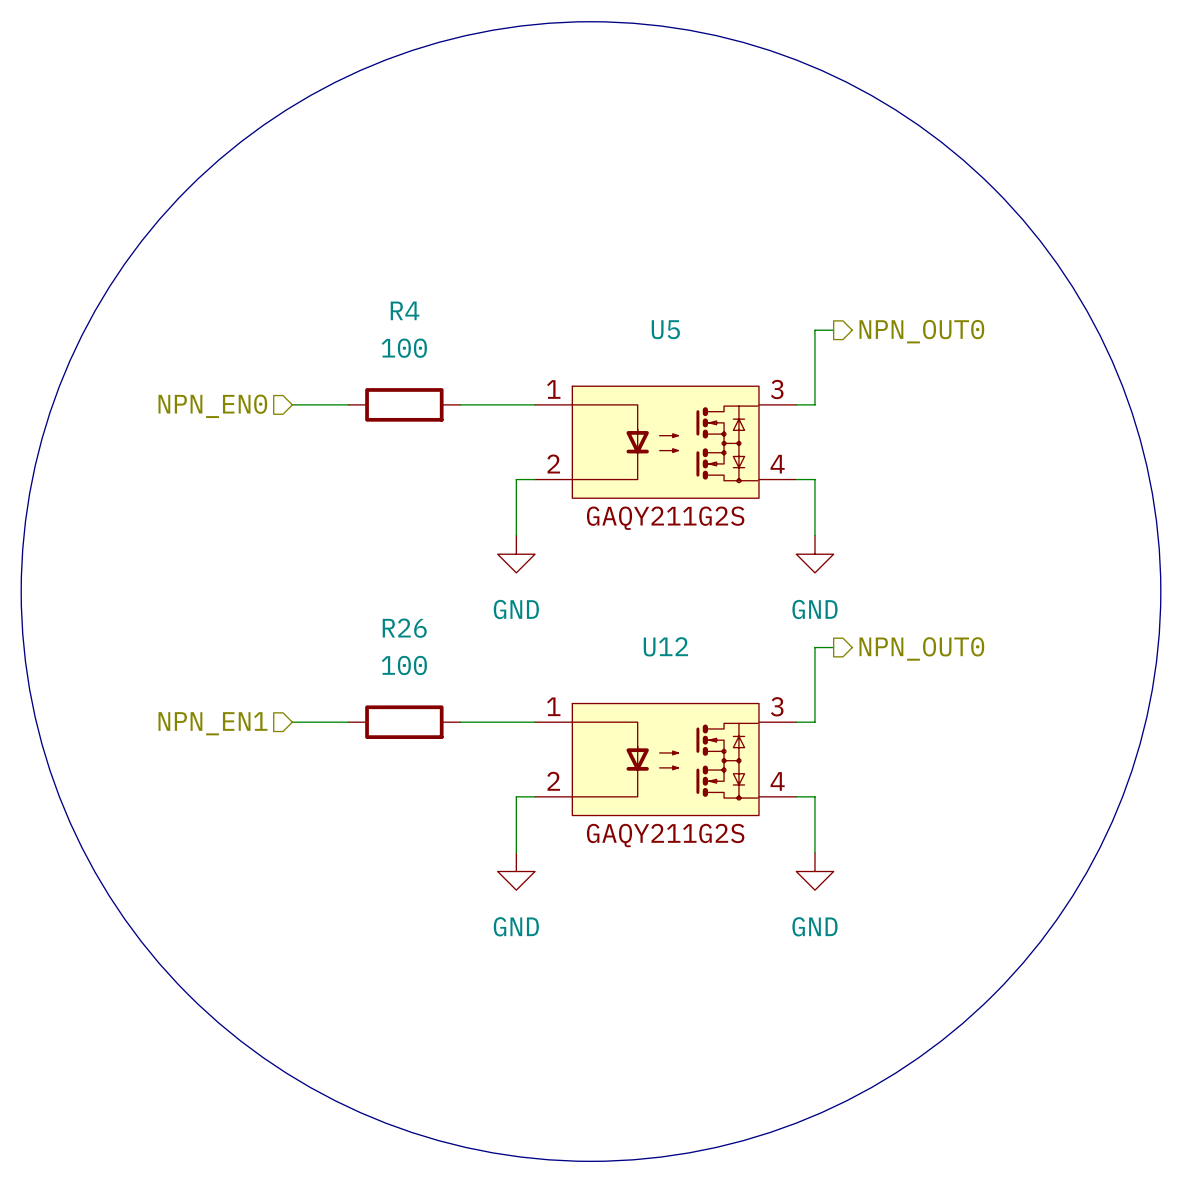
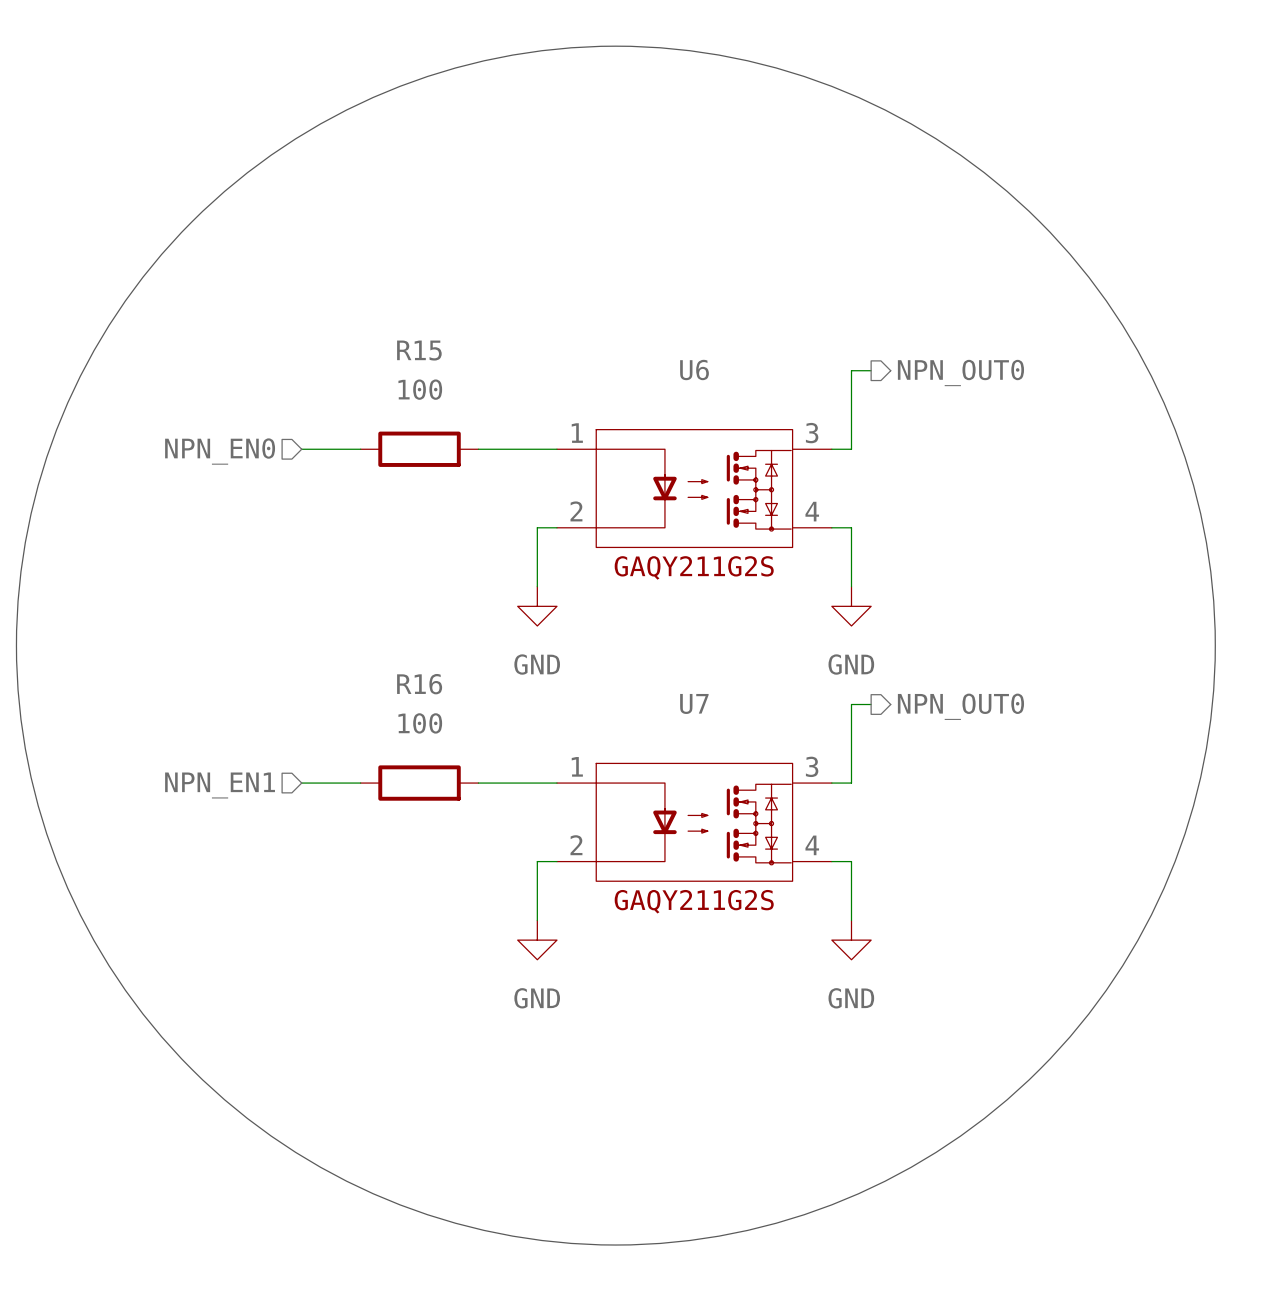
R4 name: R4 (405, 310) -> R15 (419, 350)
U5 name: U5 (665, 329) -> U6 (694, 370)
R26 name: R26 (404, 628) -> R16 (419, 684)
U12 name: U12 (665, 646) -> U7 (694, 703)

